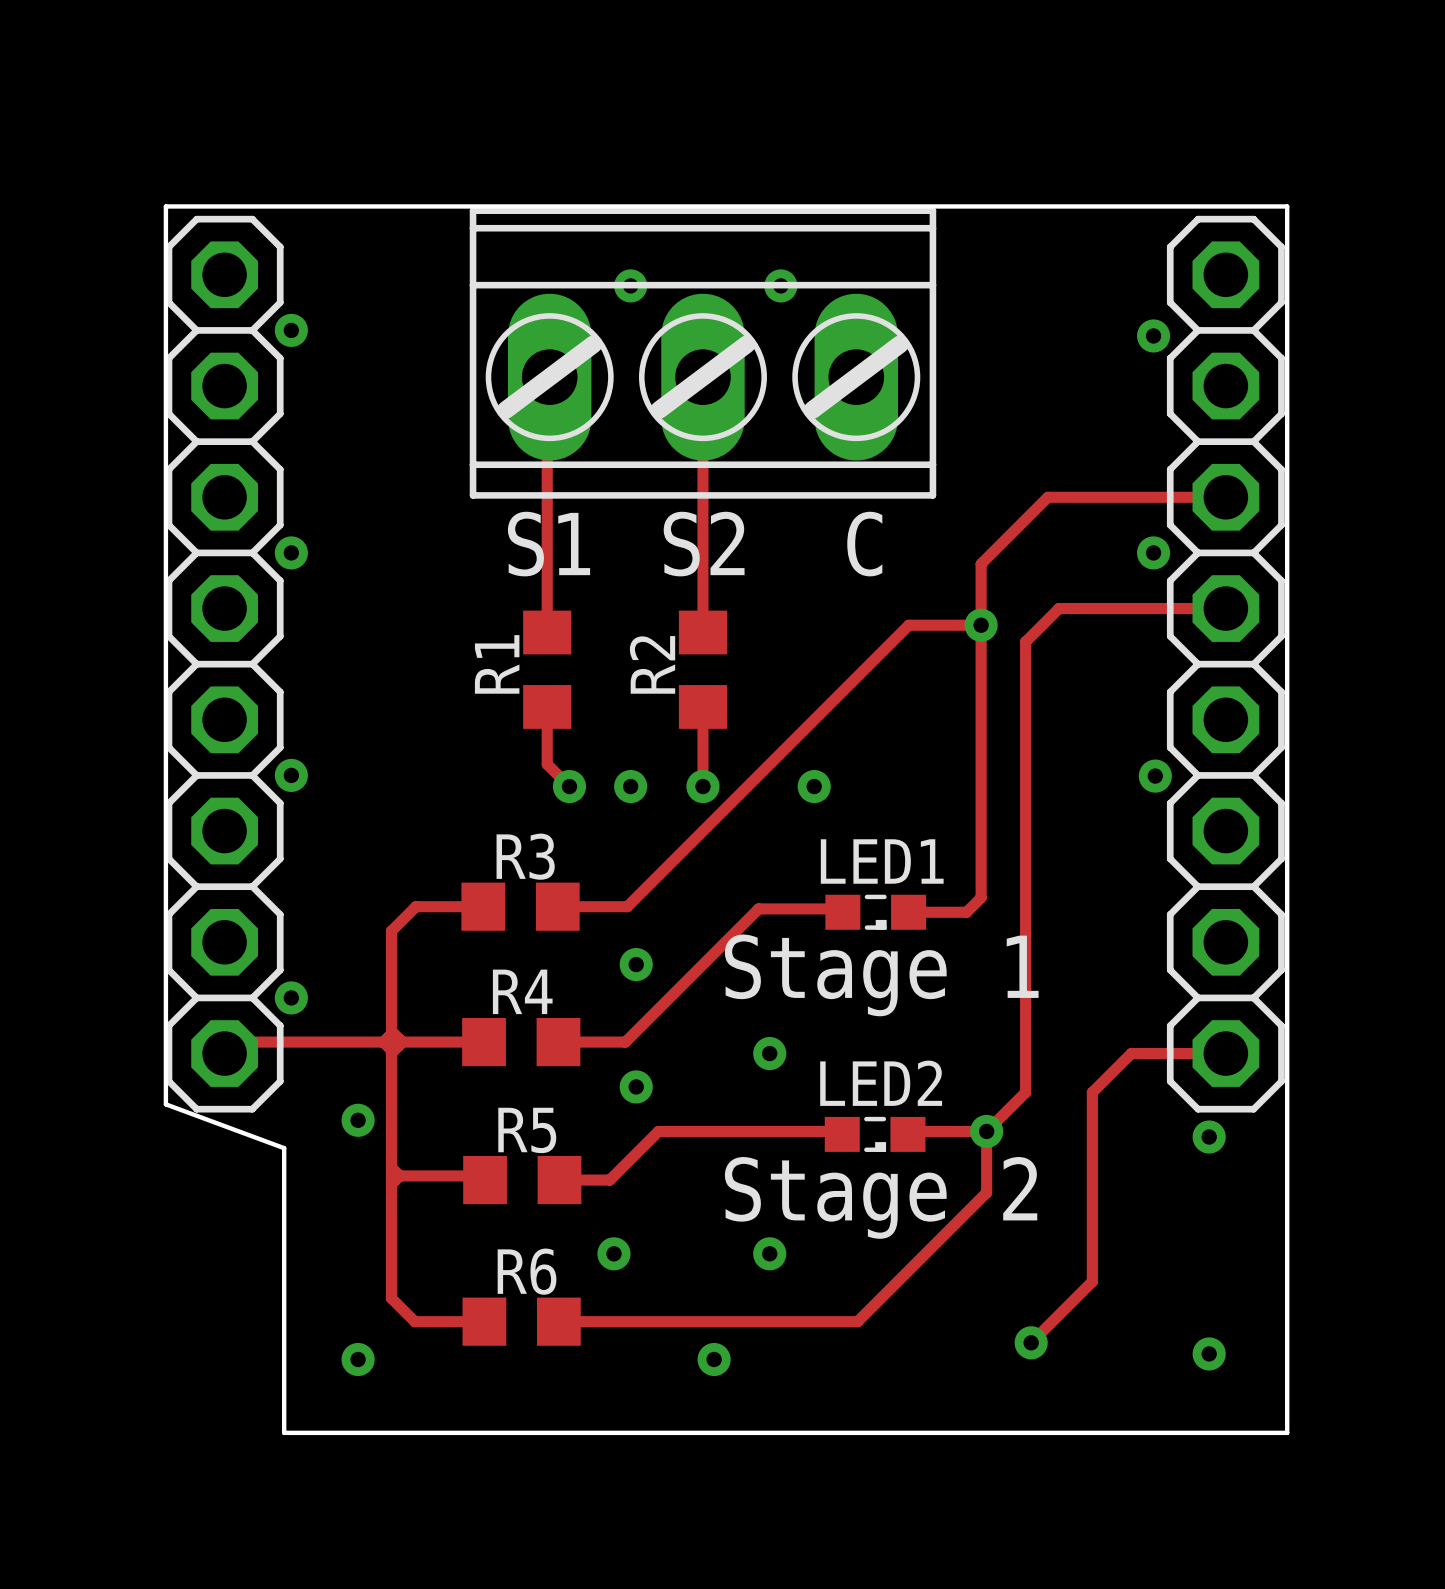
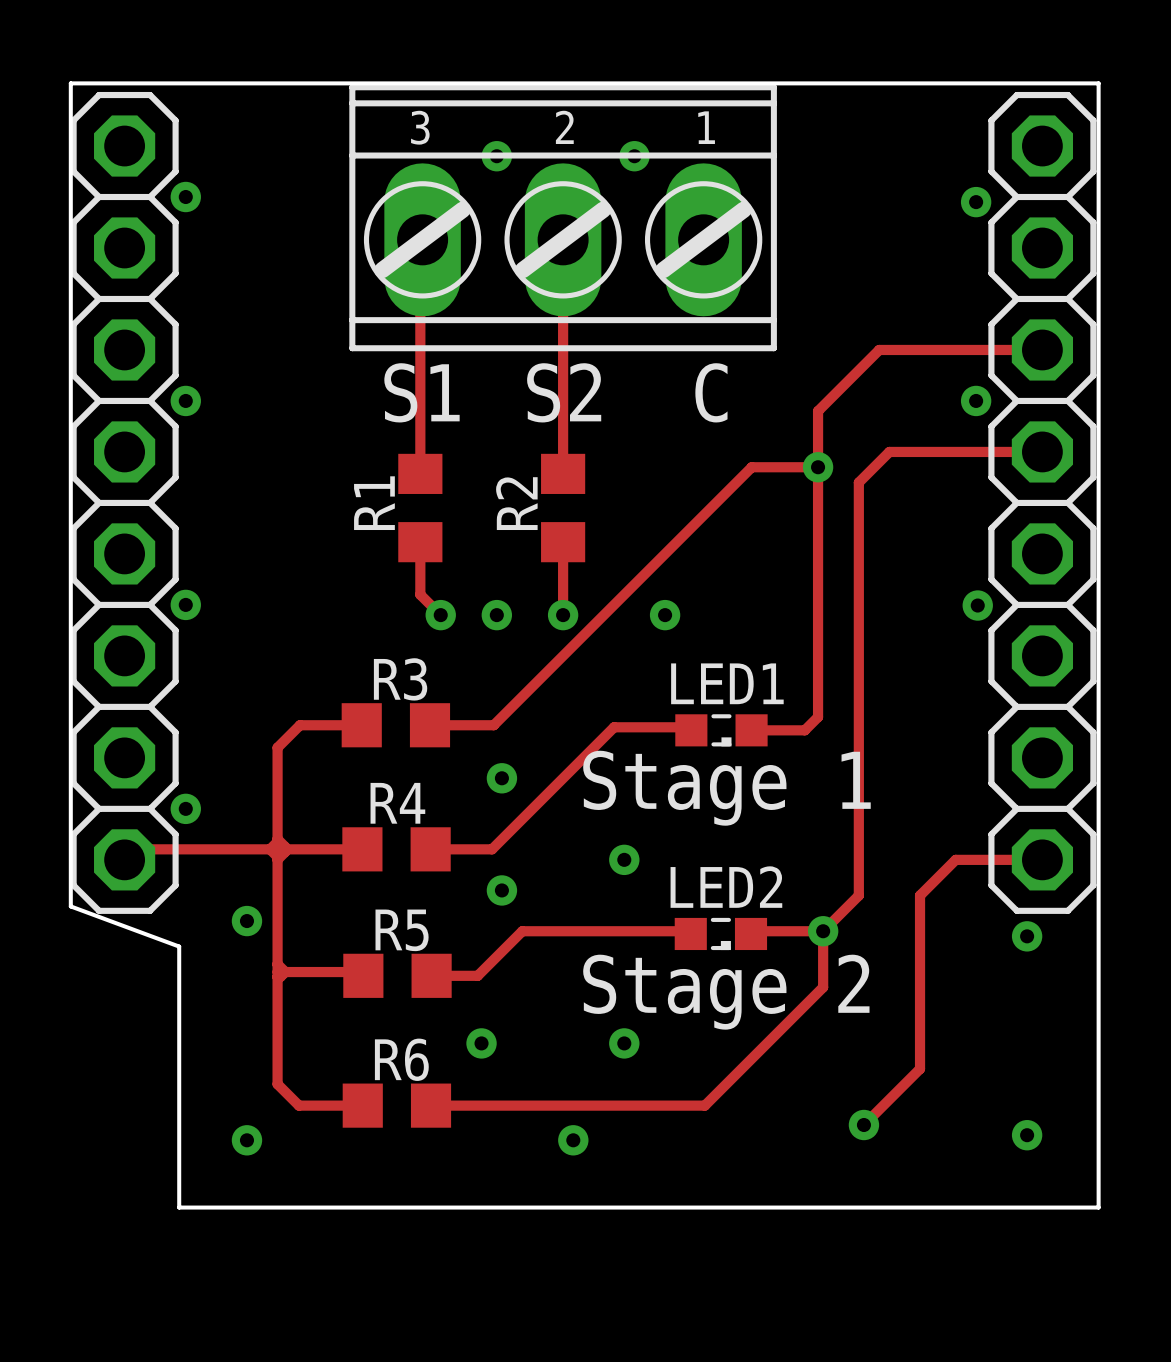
part text: none -> 3 (420, 127)
part text: none -> 2 (564, 127)
part text: none -> 1 (706, 127)

